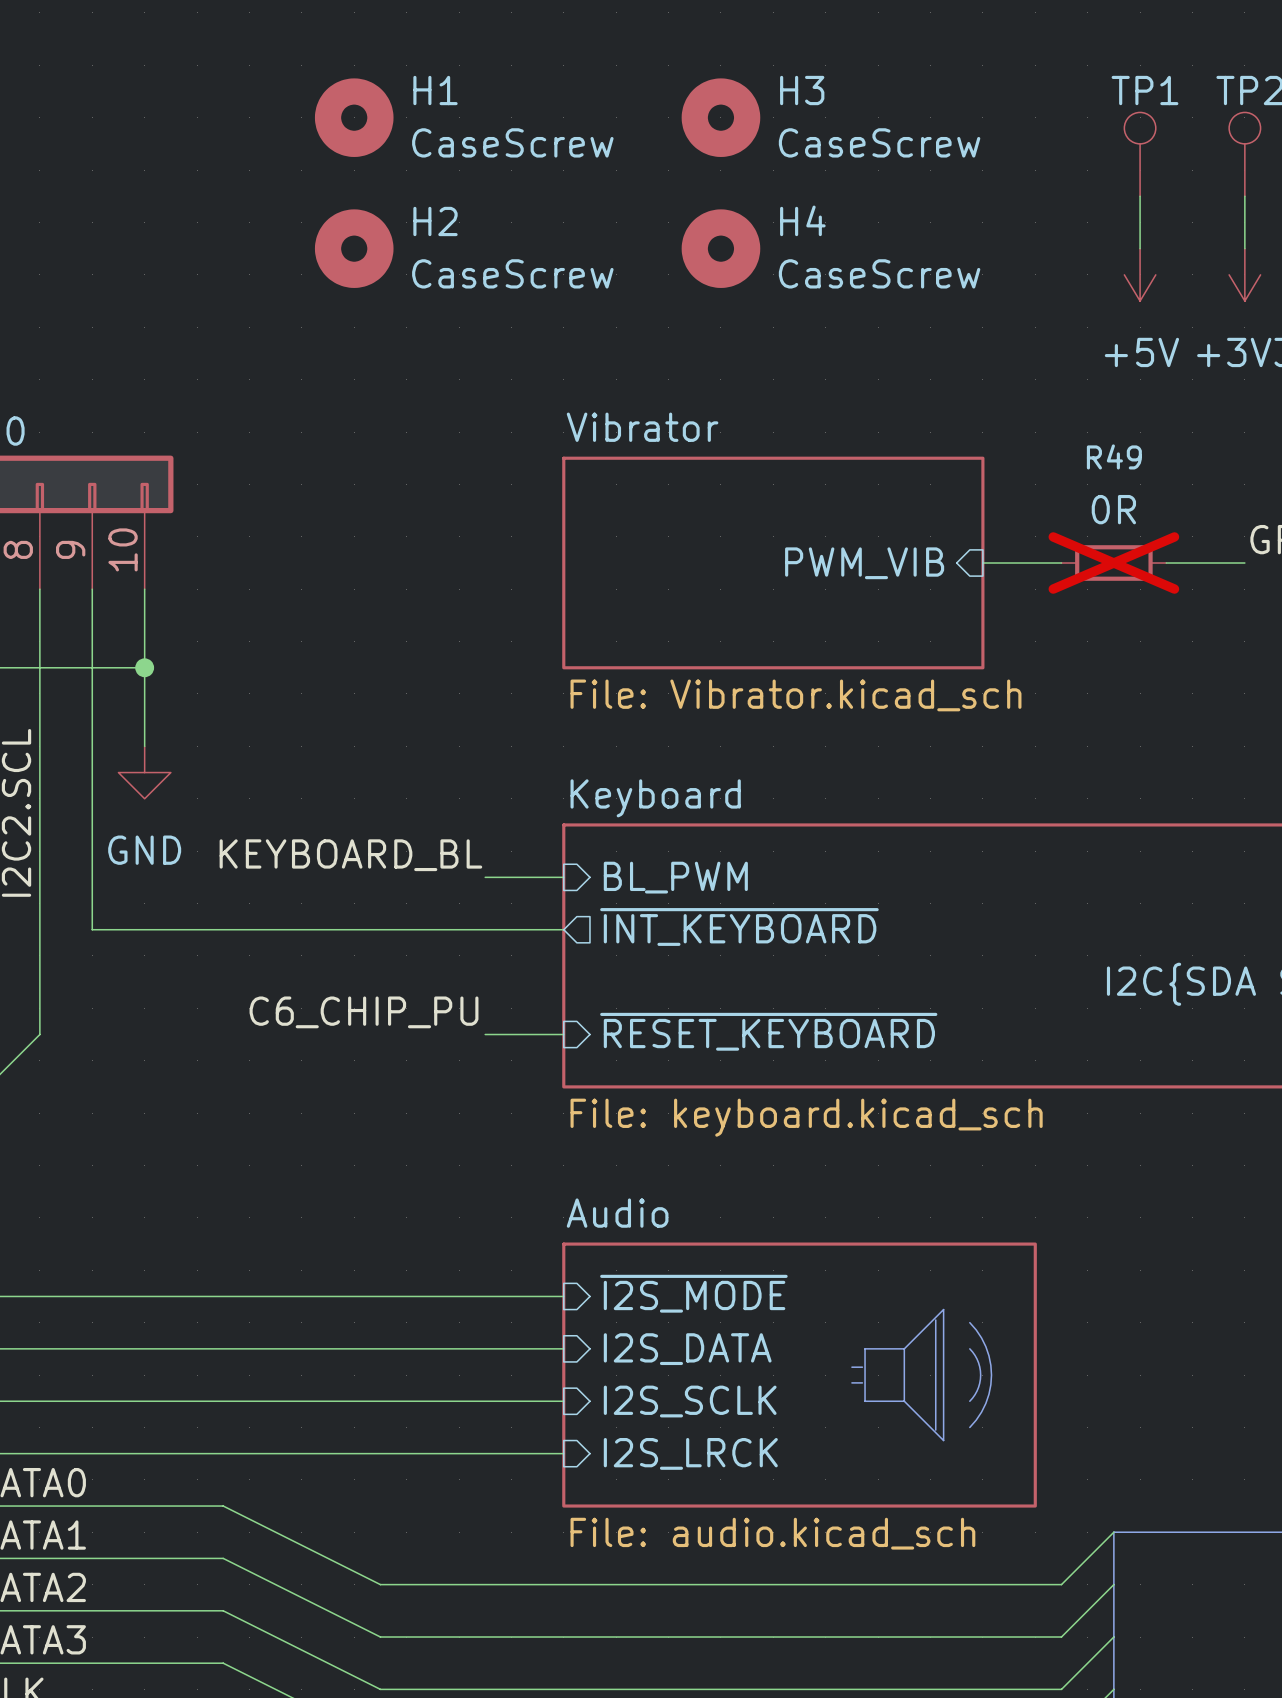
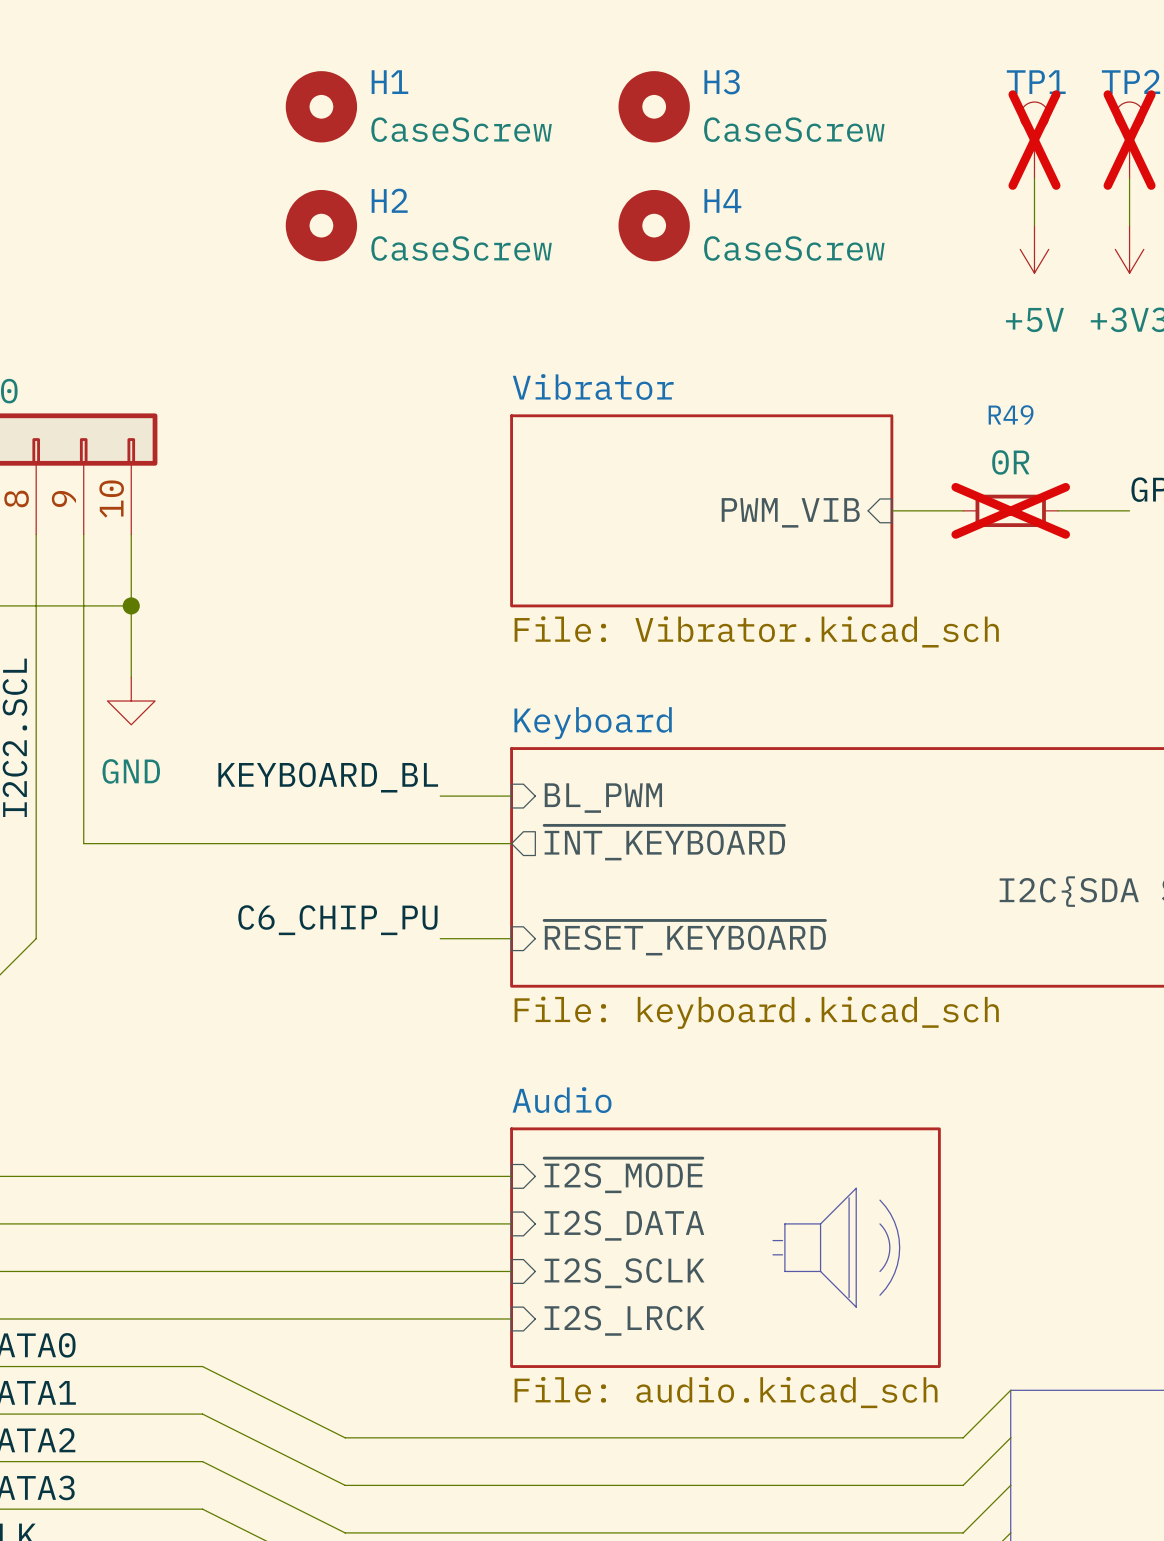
TP1 do-not-place cross: none -> (1034, 140)
TP2 do-not-place cross: none -> (1129, 140)

